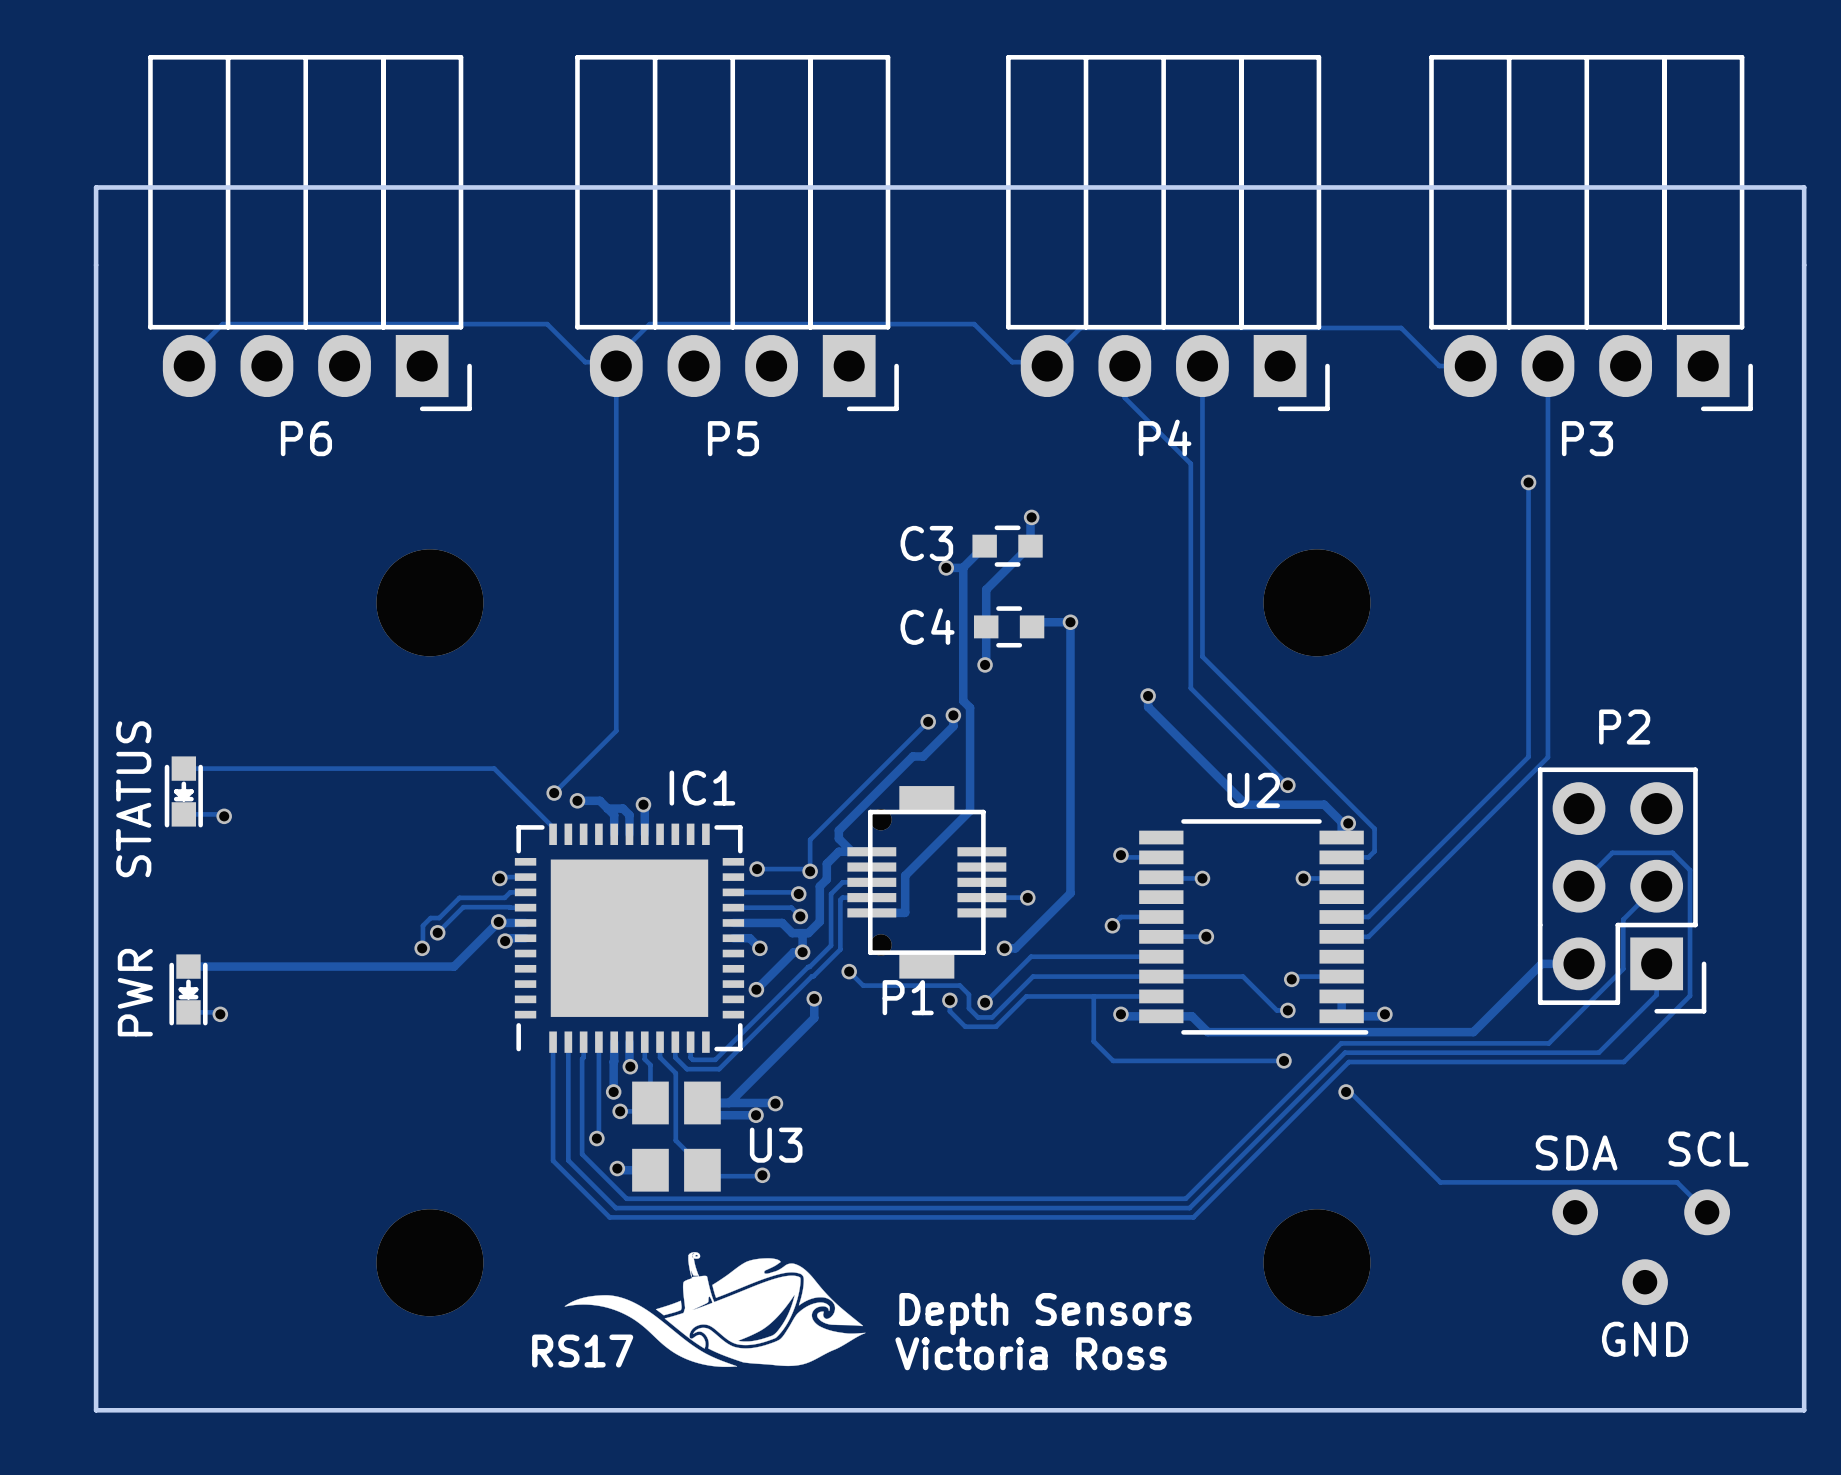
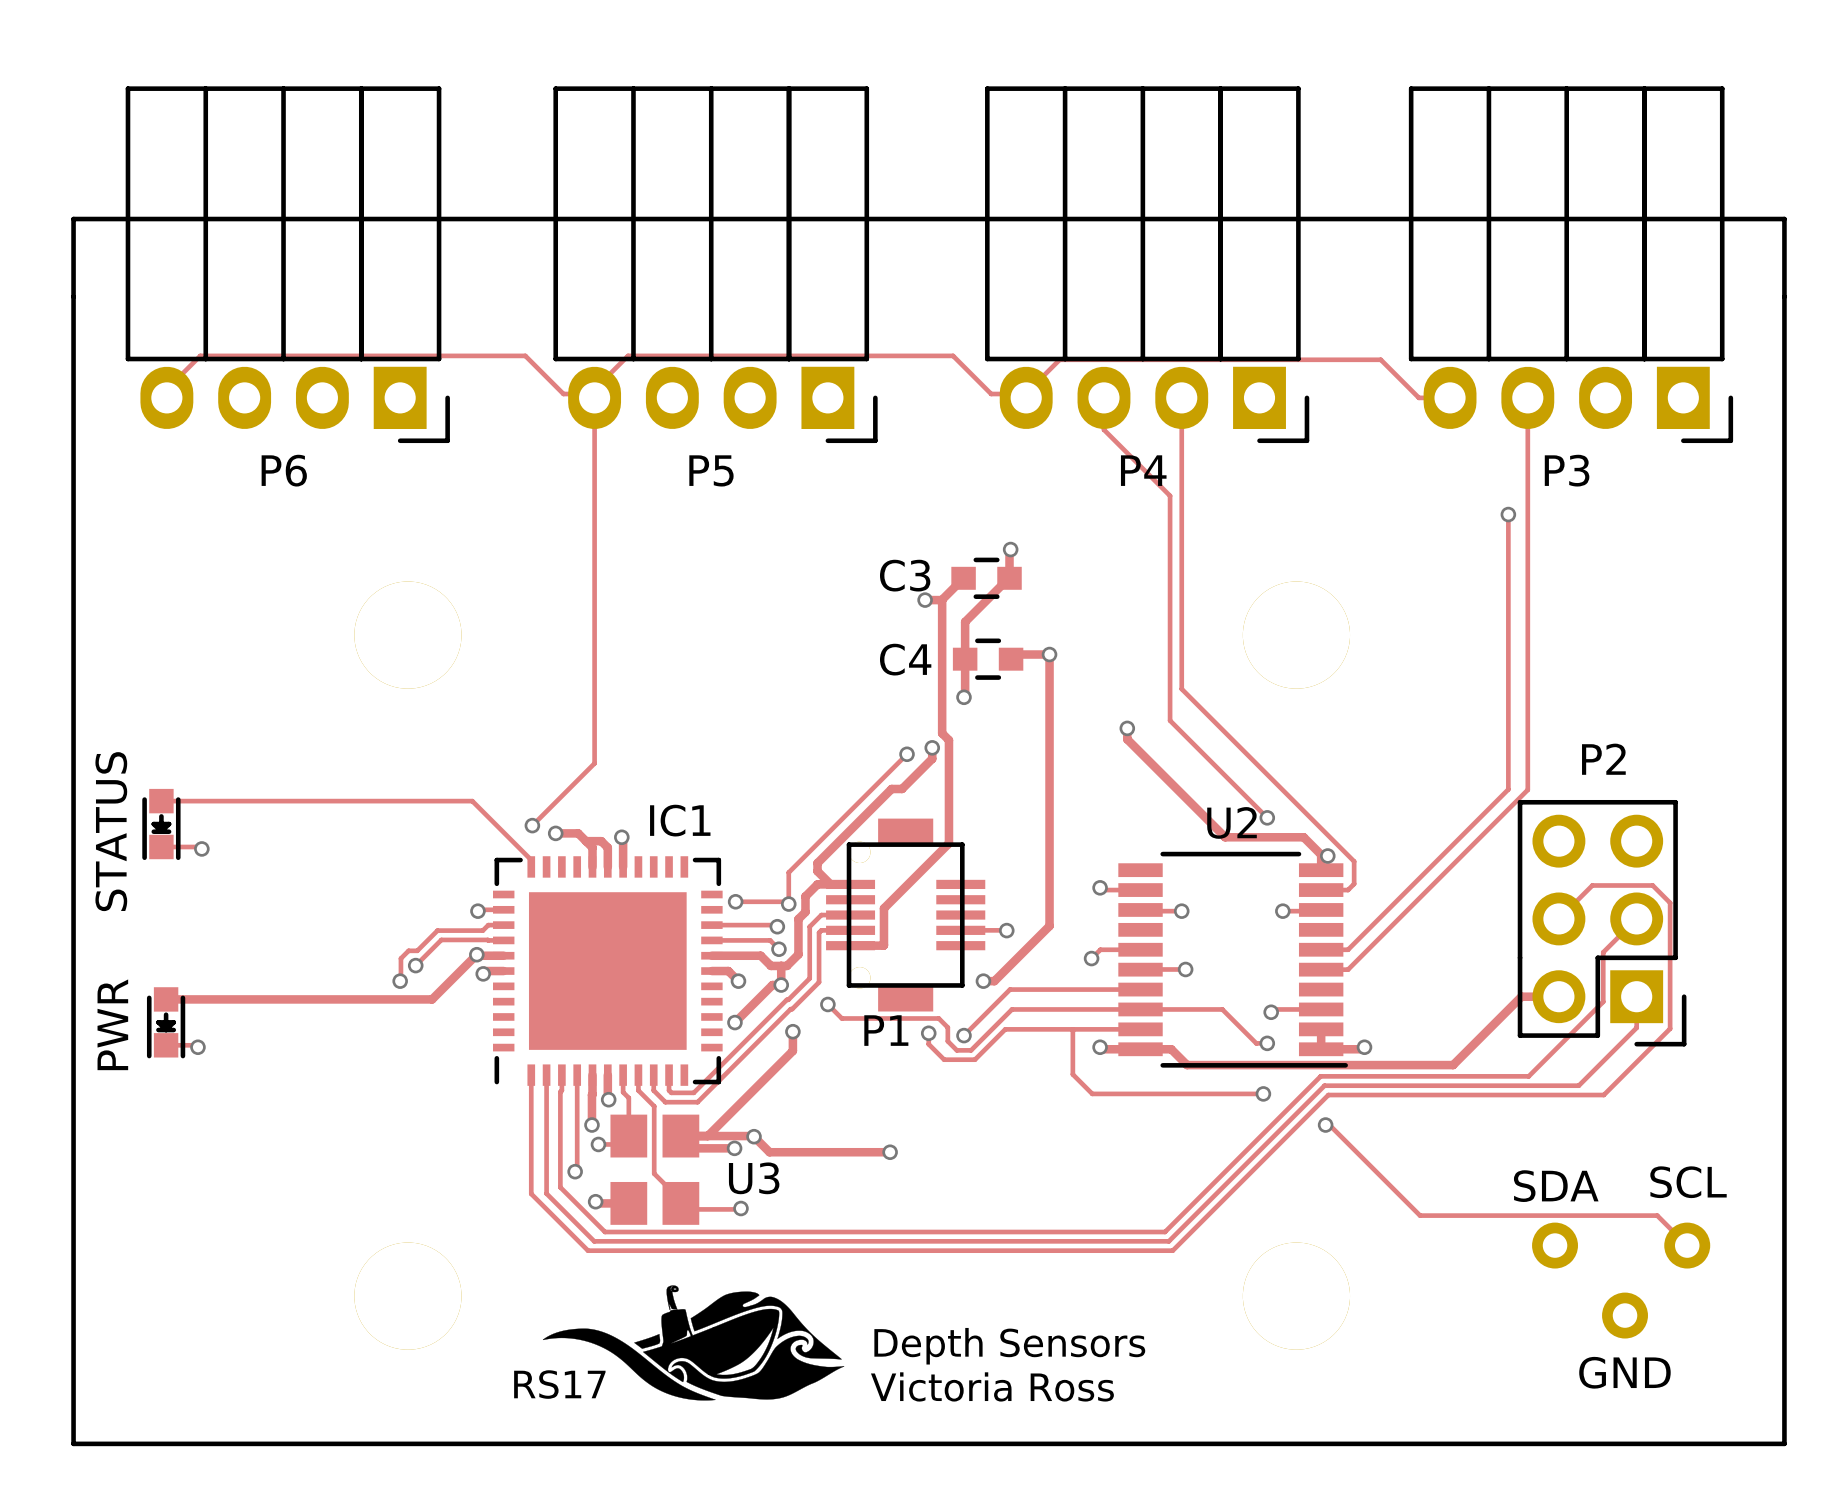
track: none -> (754, 1136) (769, 1152) (890, 1152)
via: none -> (890, 1152)

